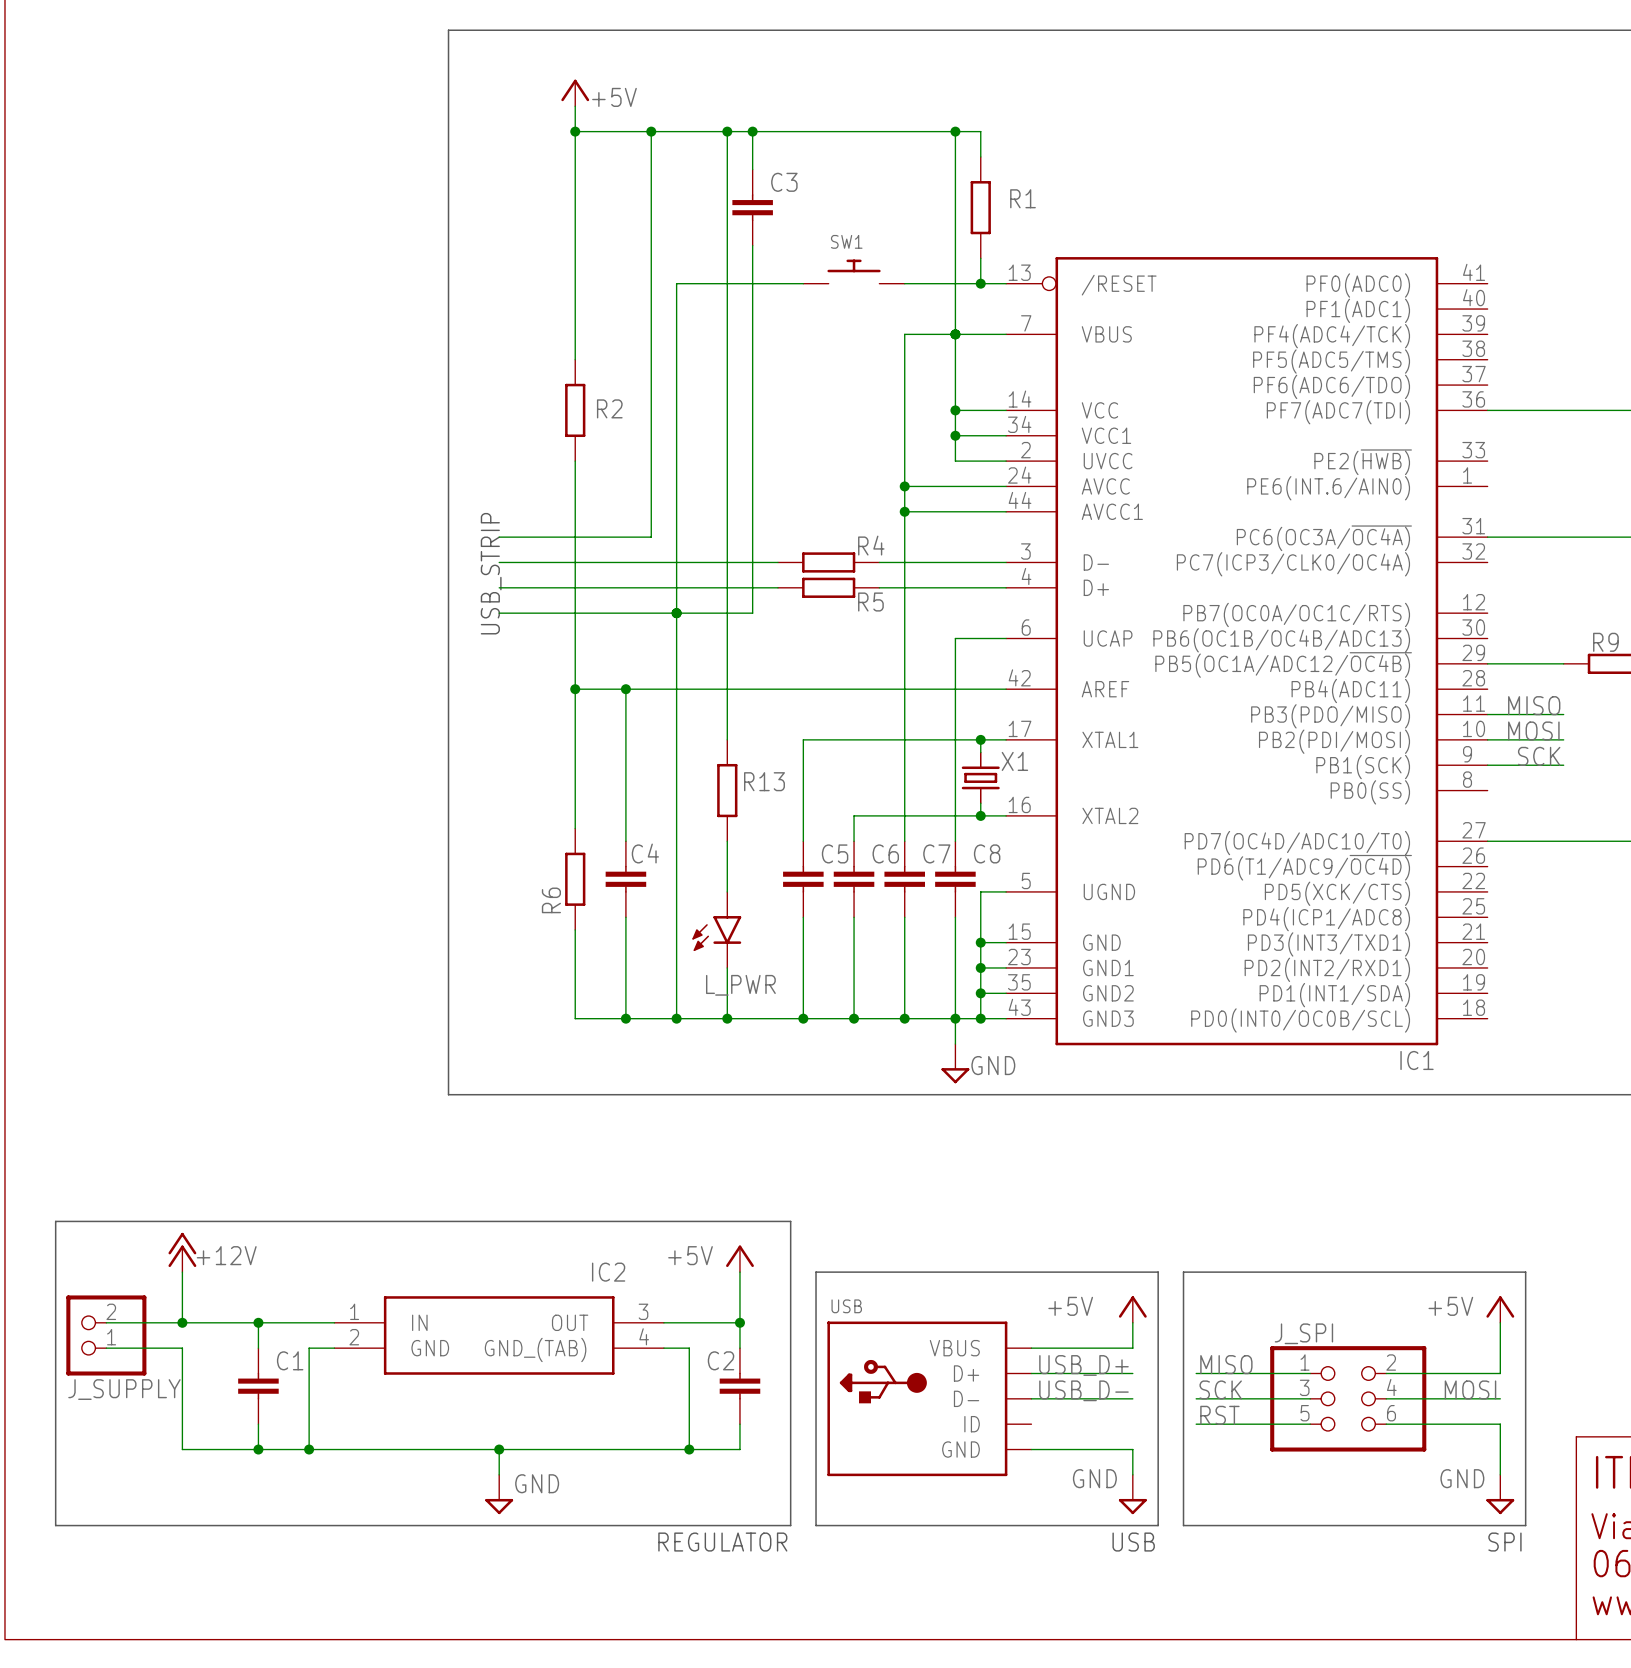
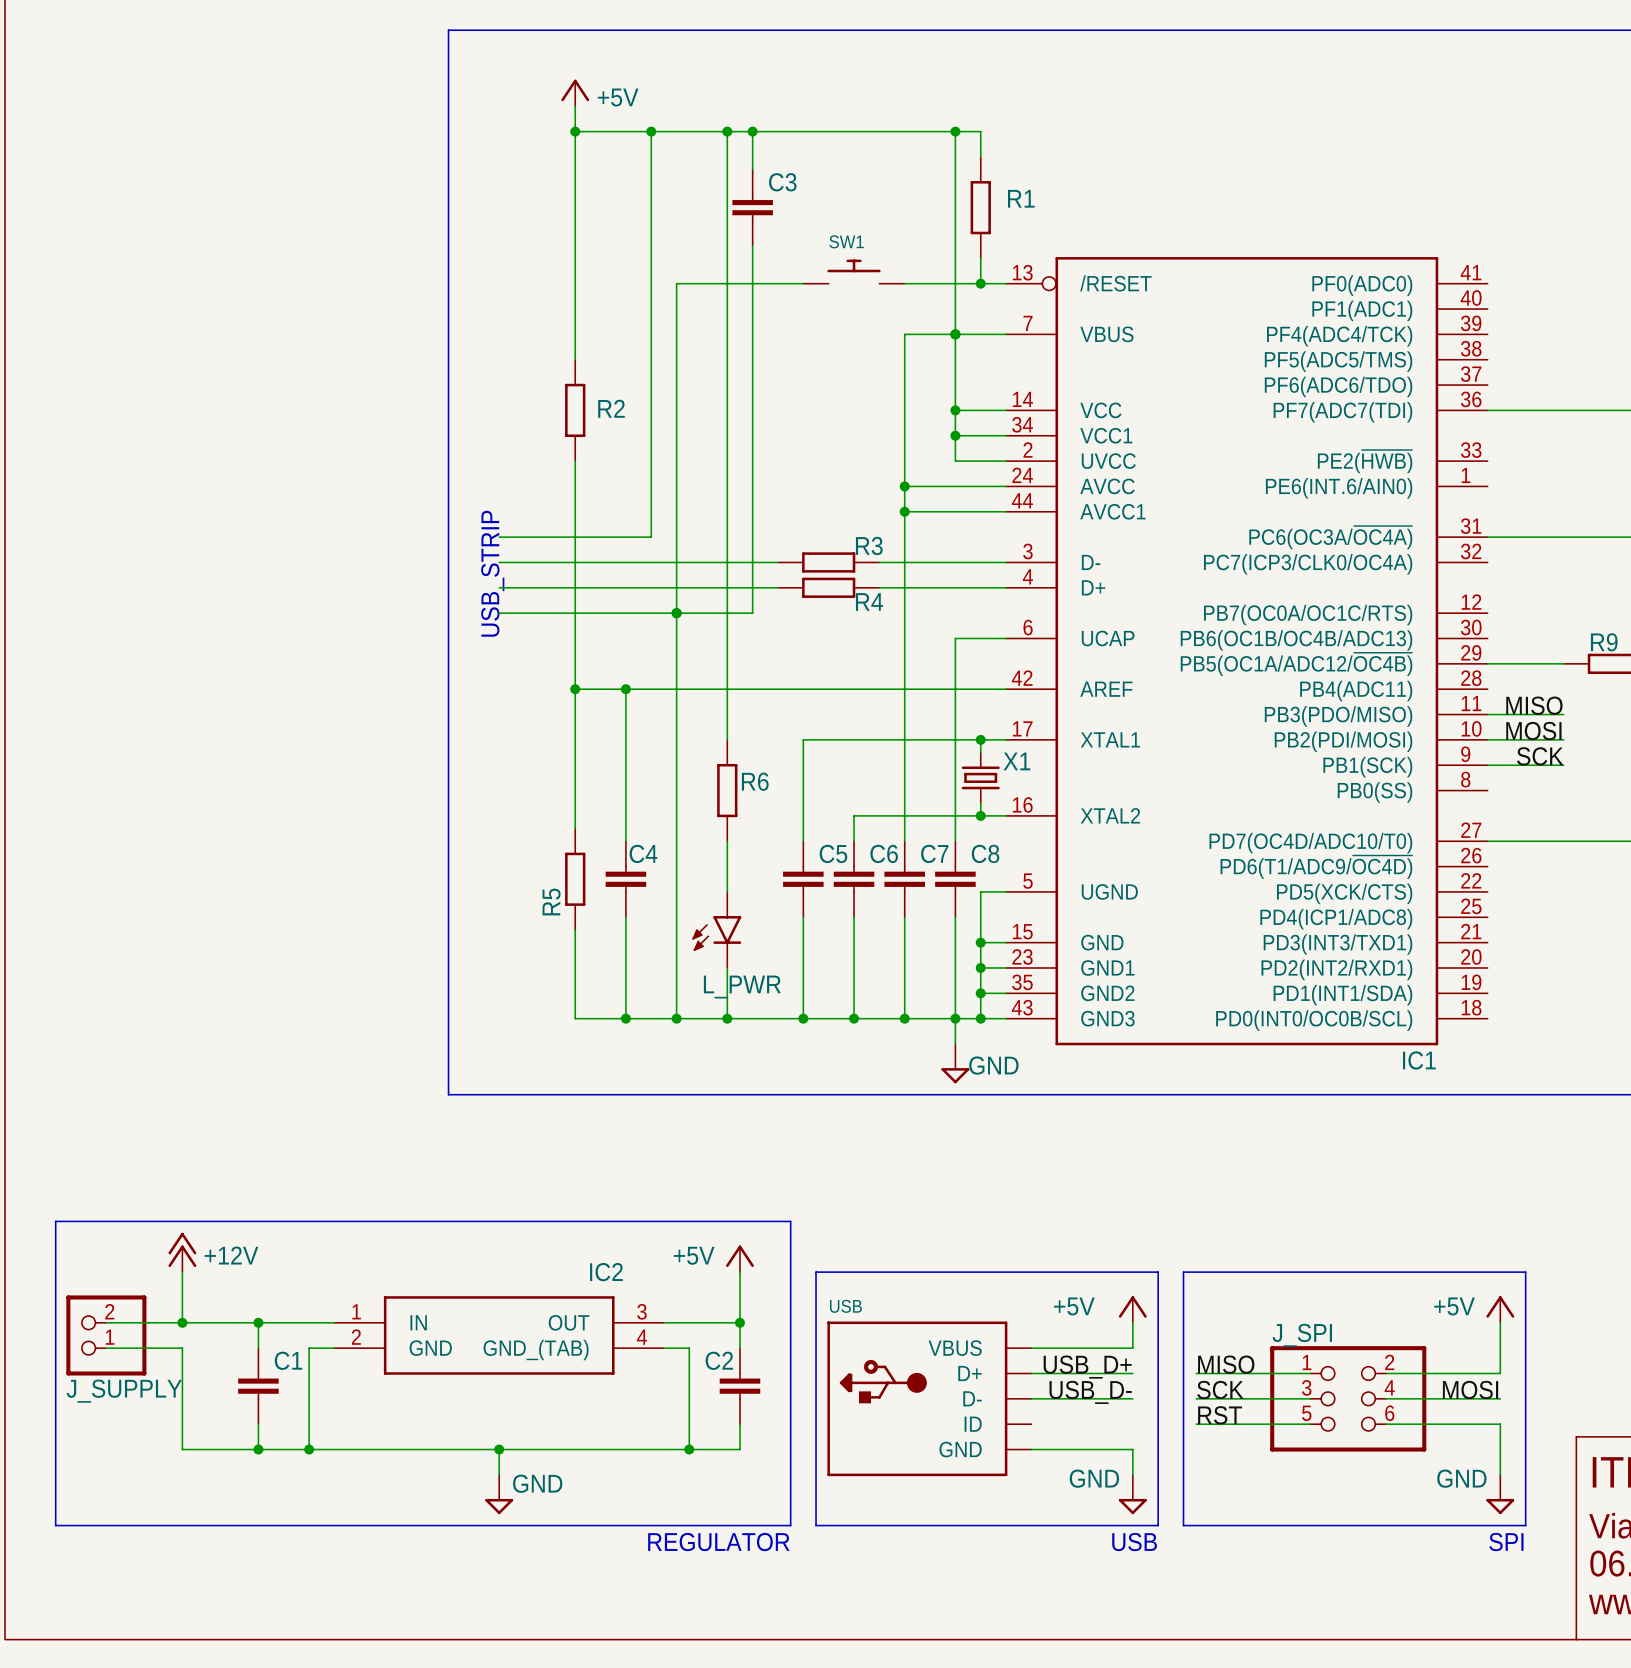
R4 name: R4 (871, 545) -> R3 (869, 545)
R5 name: R5 (870, 602) -> R4 (869, 602)
R13 name: R13 (764, 781) -> R6 (755, 781)
R6 name: R6 (551, 900) -> R5 (551, 901)

